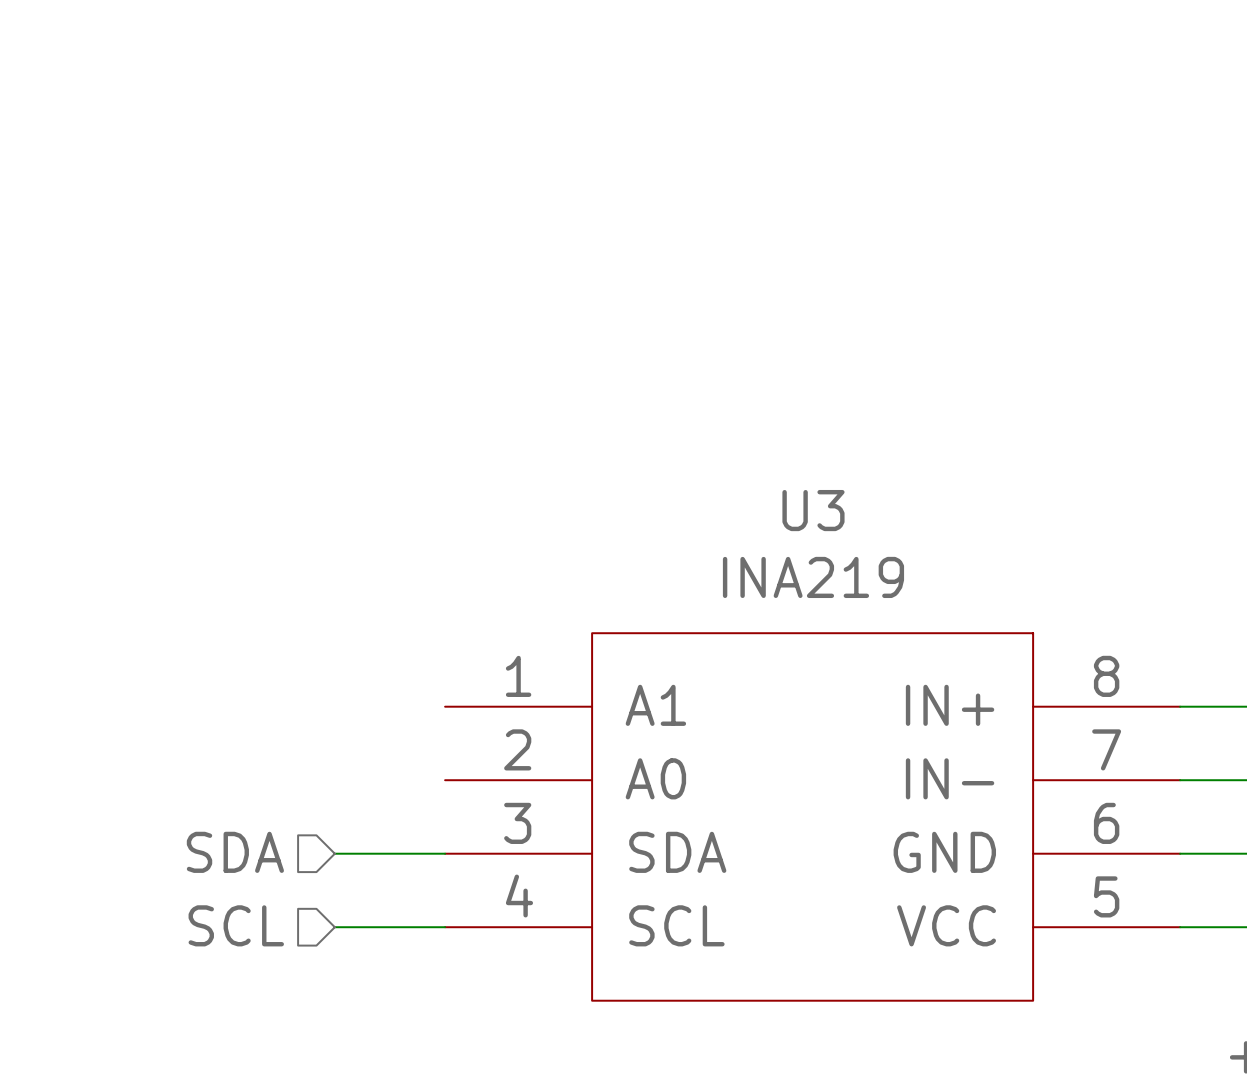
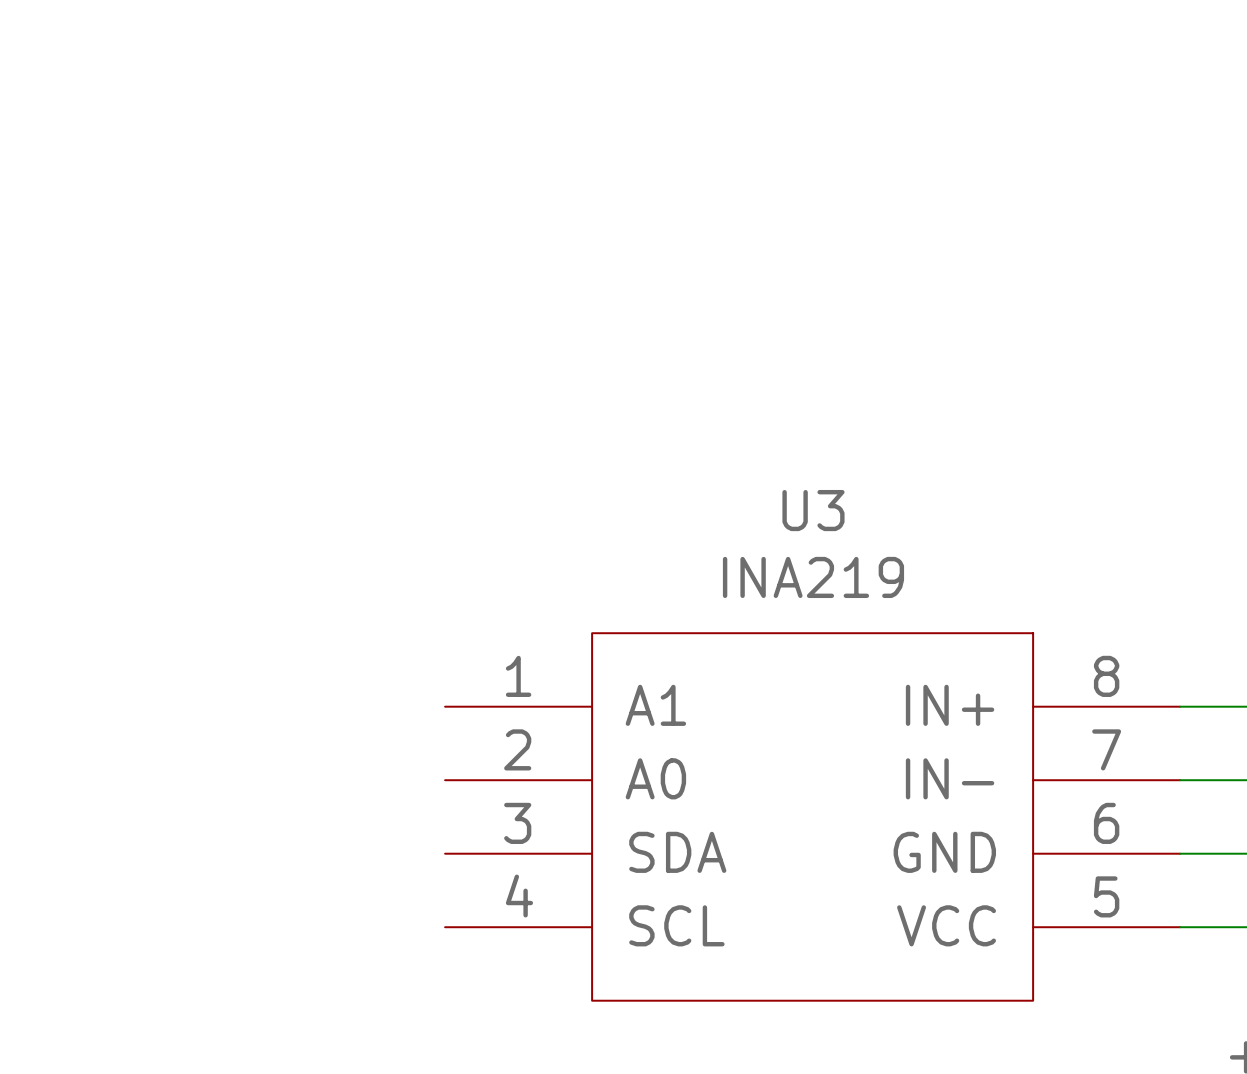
hierarchical label: SDA (235, 852) -> none
wire: (334, 853) (445, 853) -> none
hierarchical label: SCL (236, 925) -> none
wire: (334, 927) (445, 927) -> none

